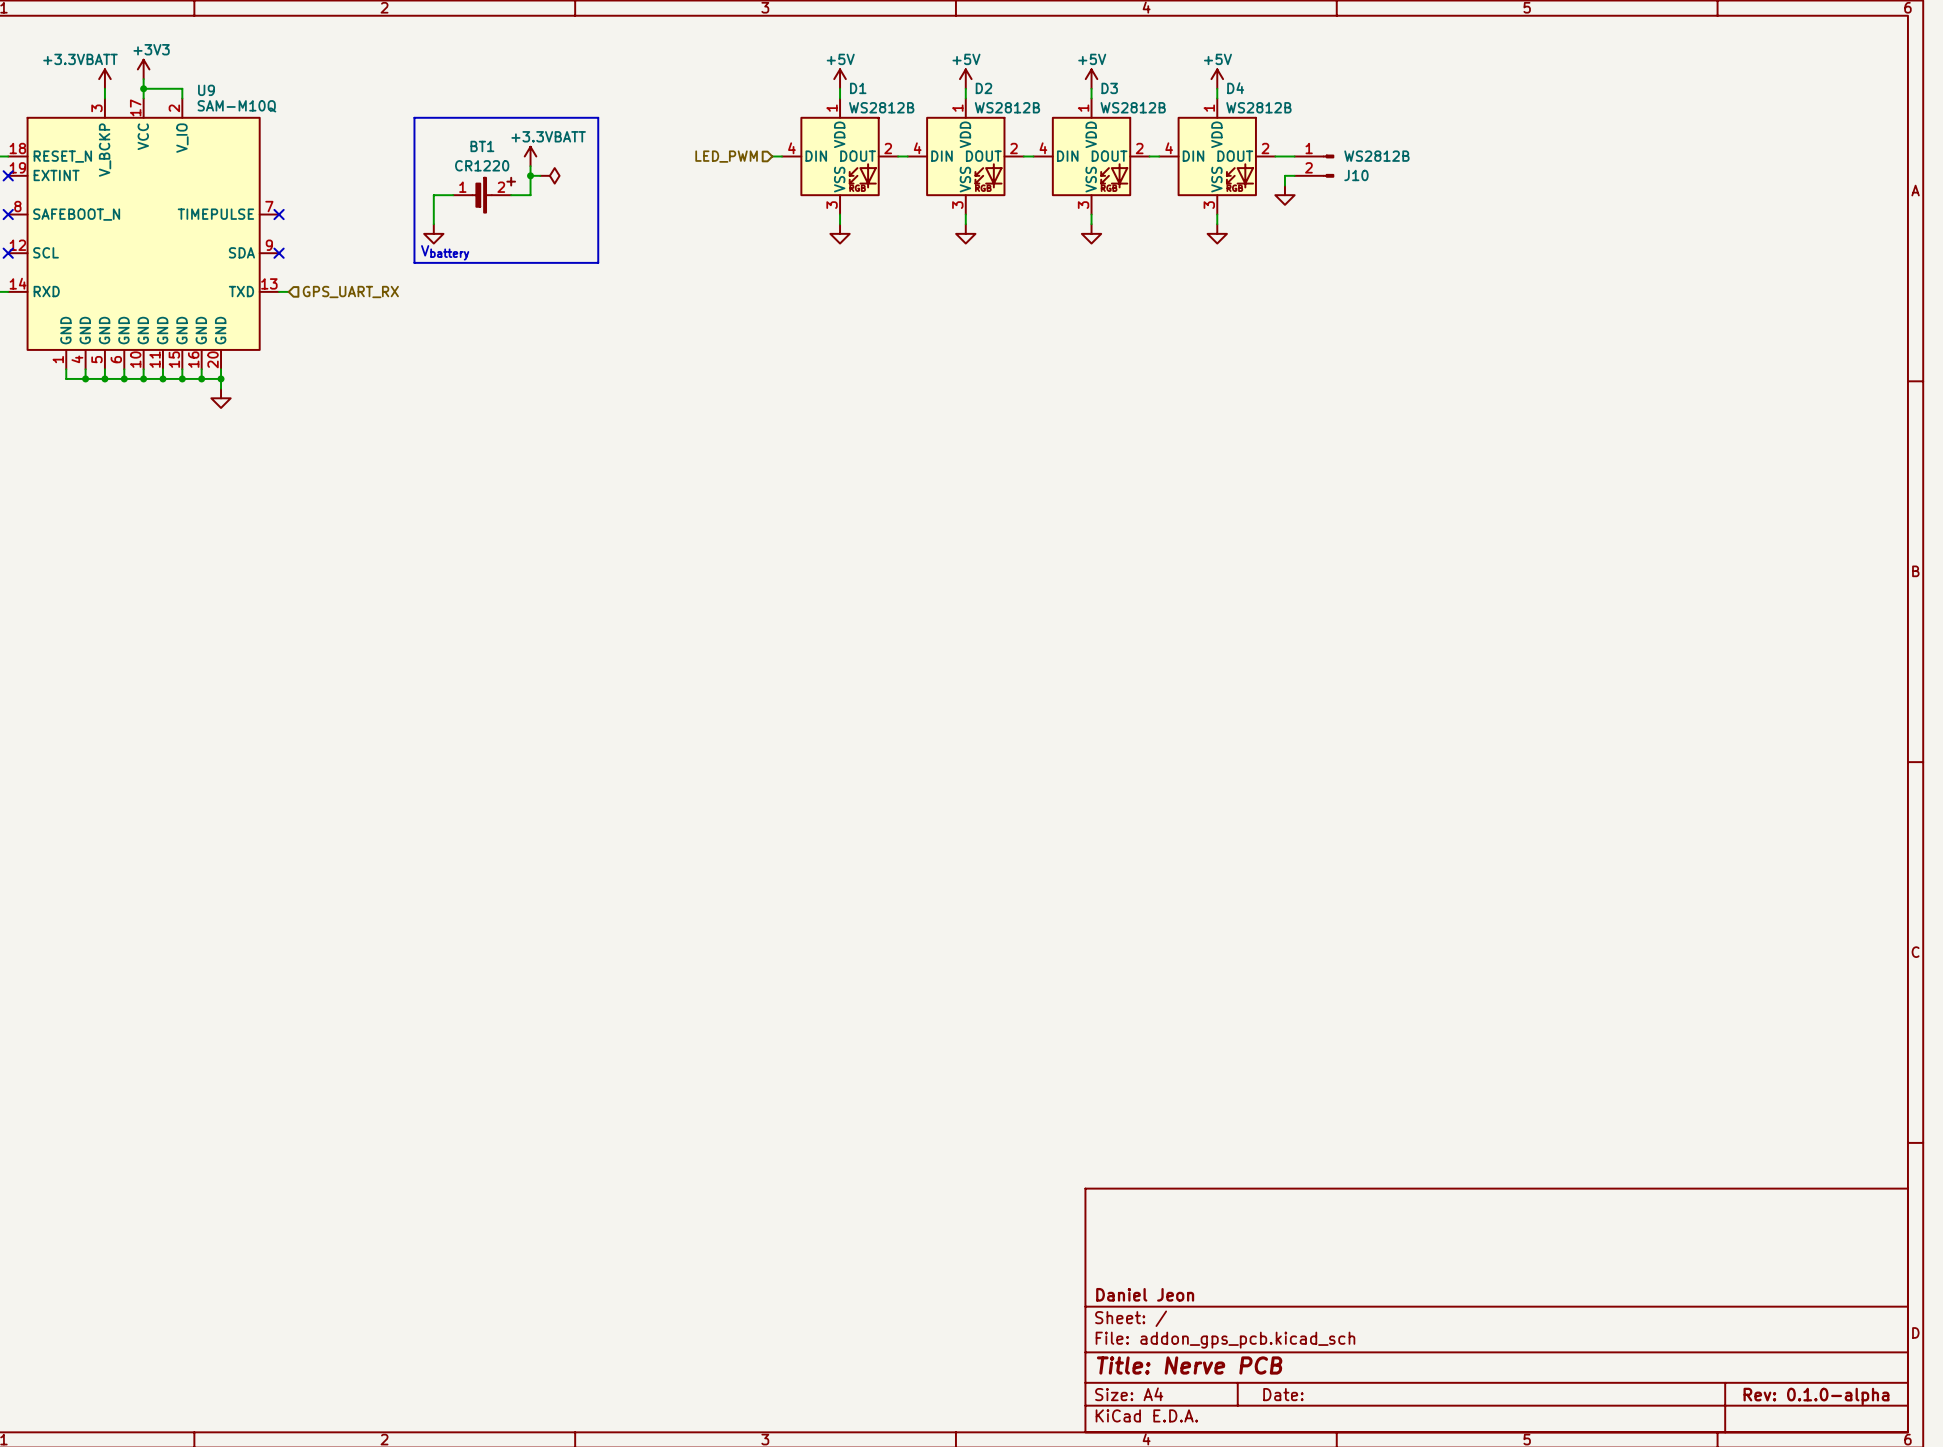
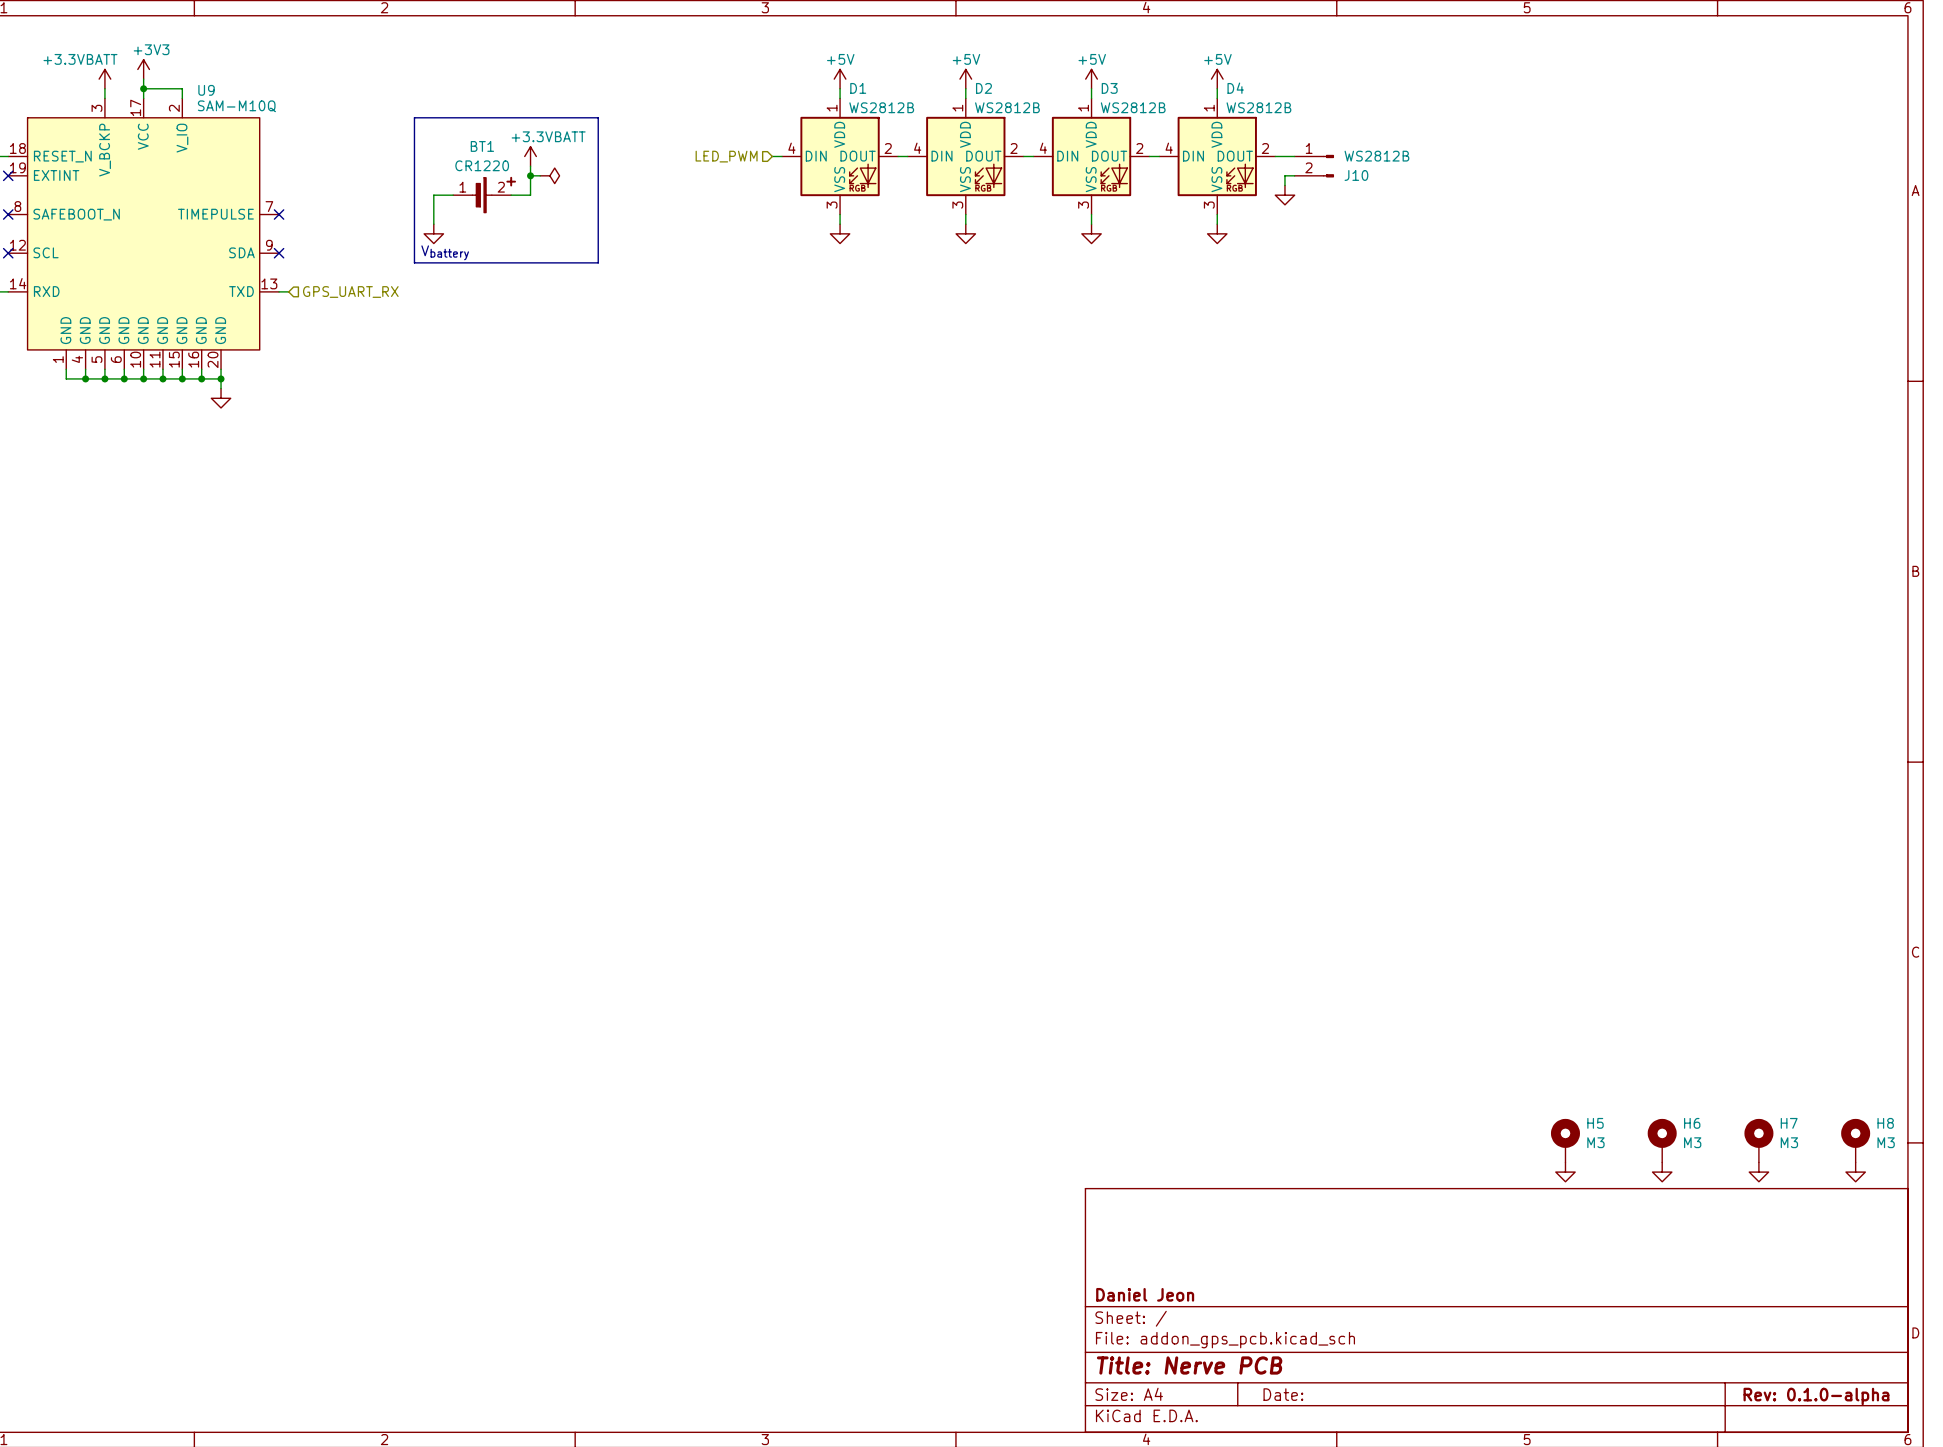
H5: none -> M3 (1565, 1140)
H6: none -> M3 (1662, 1140)
H7: none -> M3 (1758, 1140)
H8: none -> M3 (1855, 1140)
power symbol: none -> (1565, 1172)
power symbol: none -> (1662, 1172)
power symbol: none -> (1758, 1172)
power symbol: none -> (1855, 1172)

